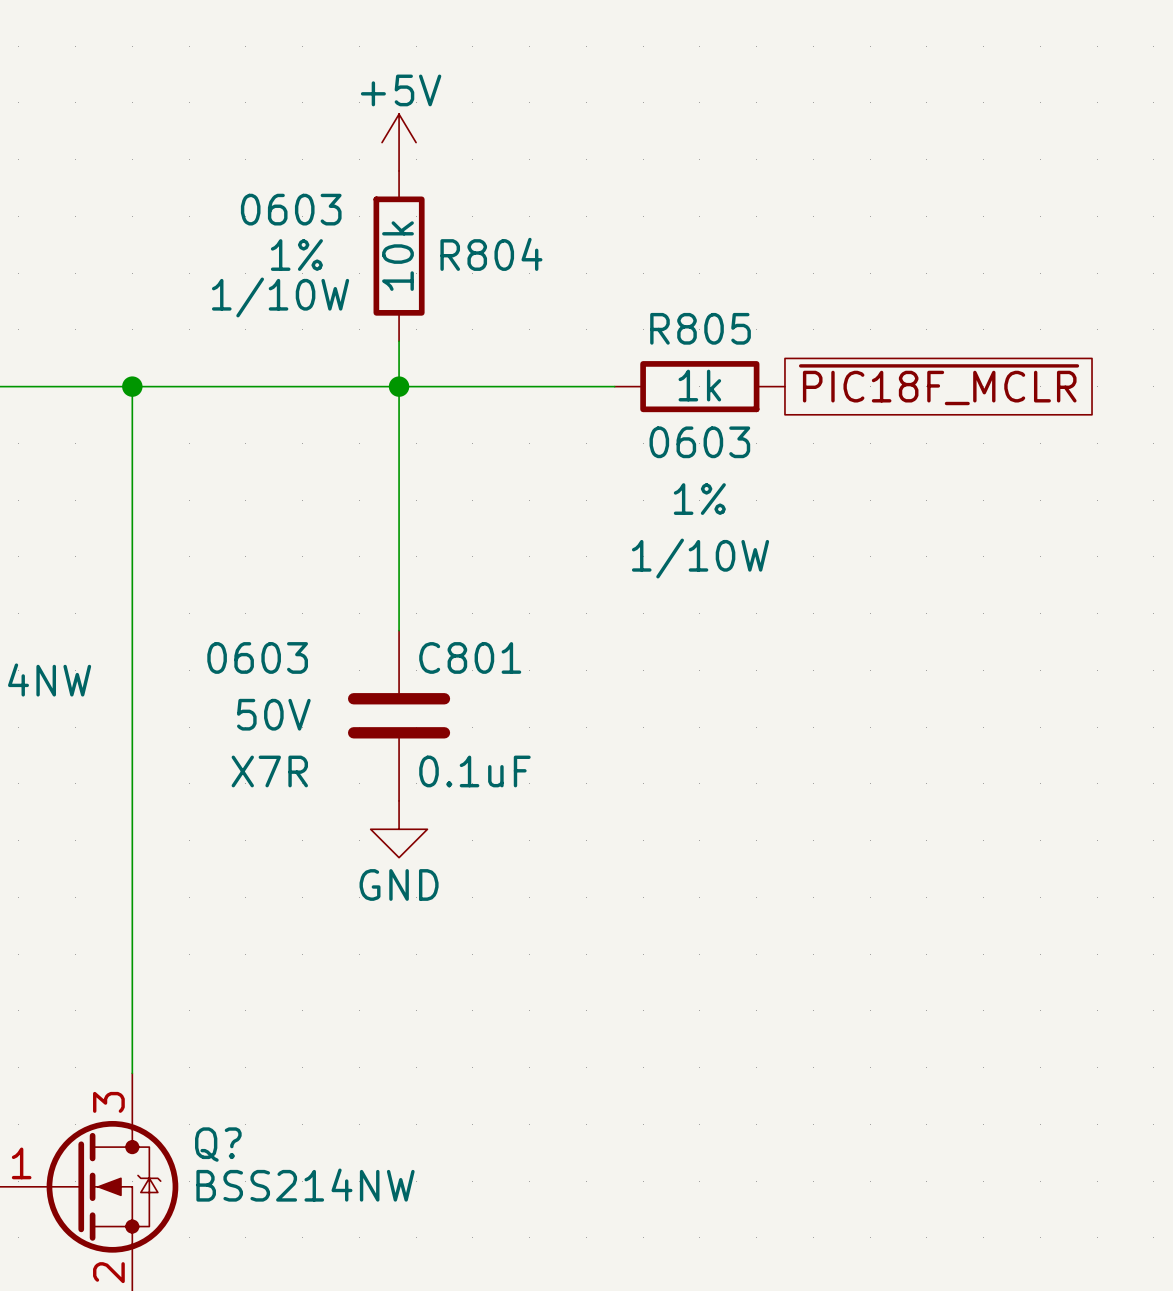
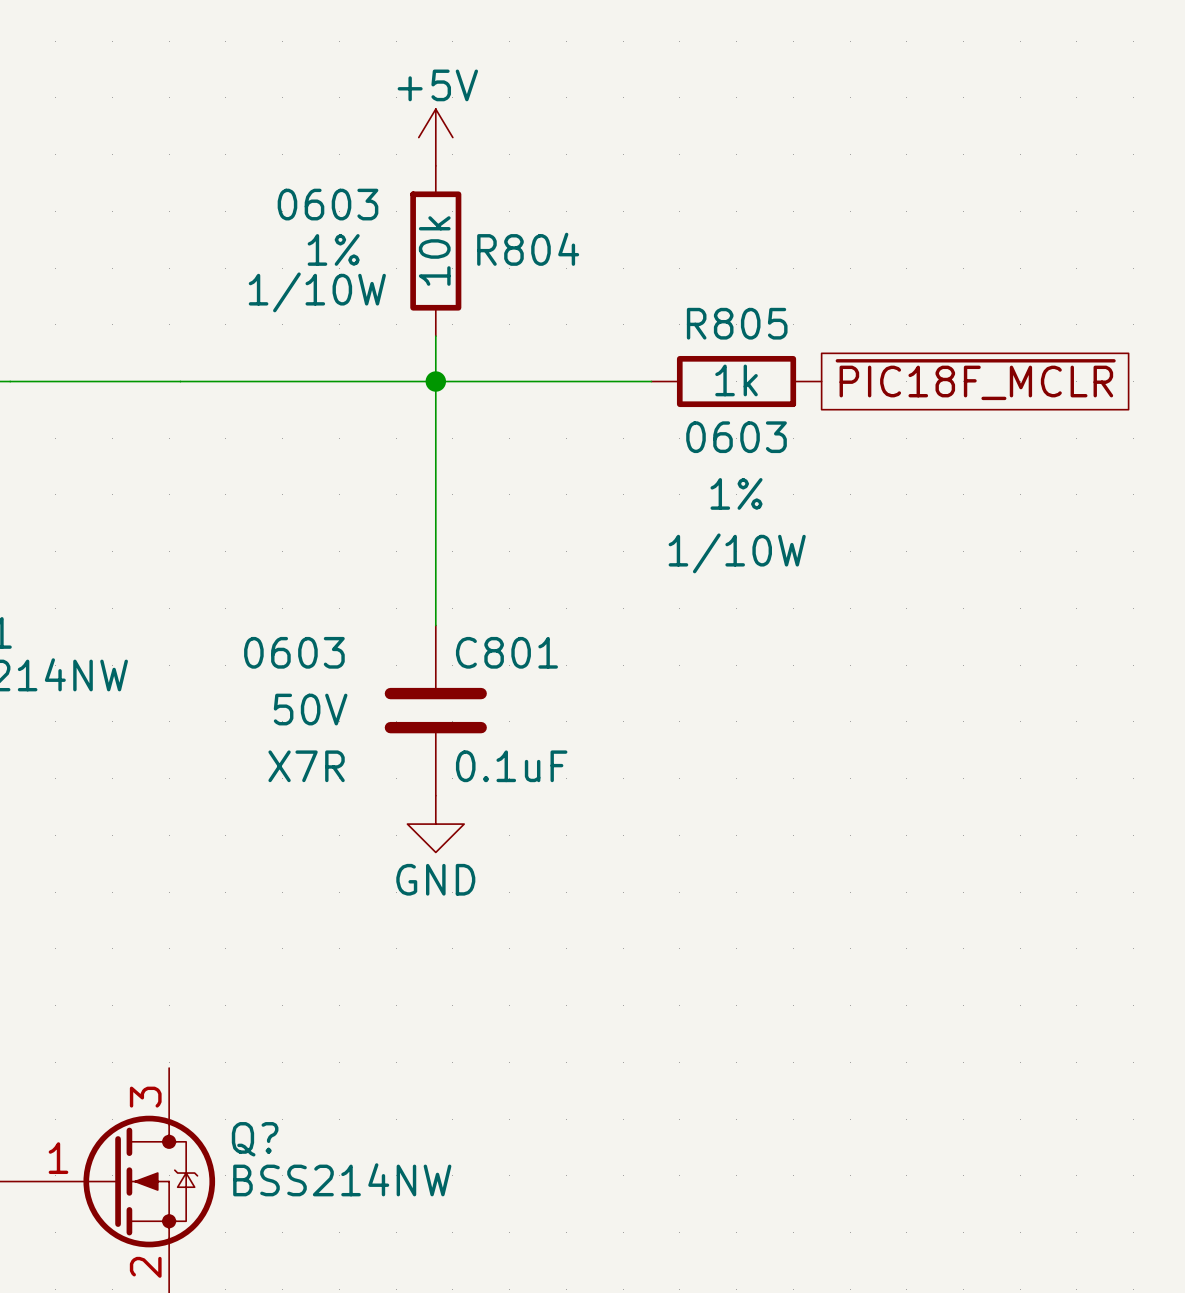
wire: (132, 386) (132, 1073) -> none
junction: (132, 386) -> none

